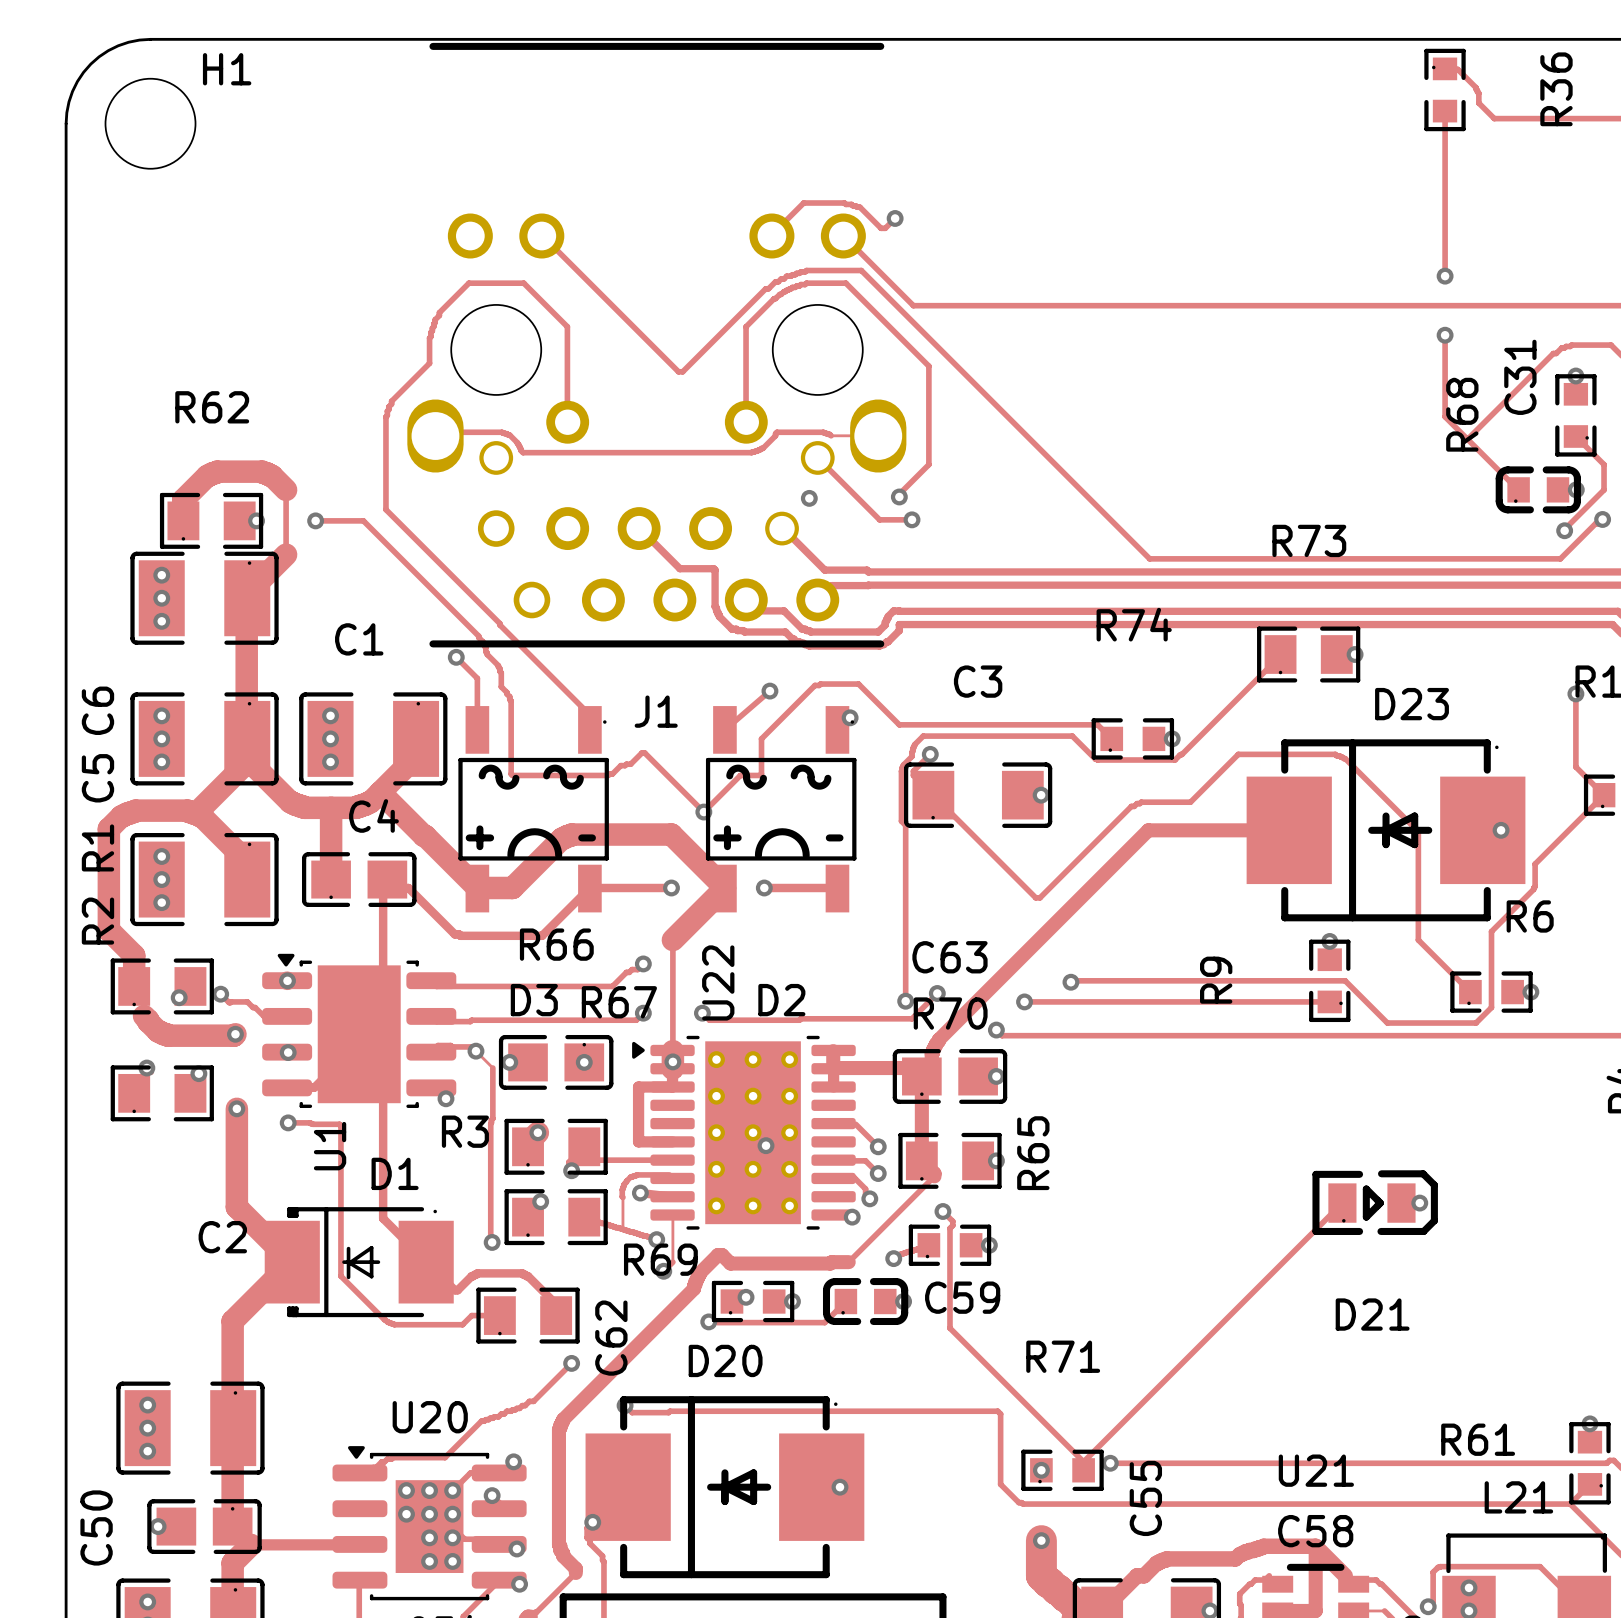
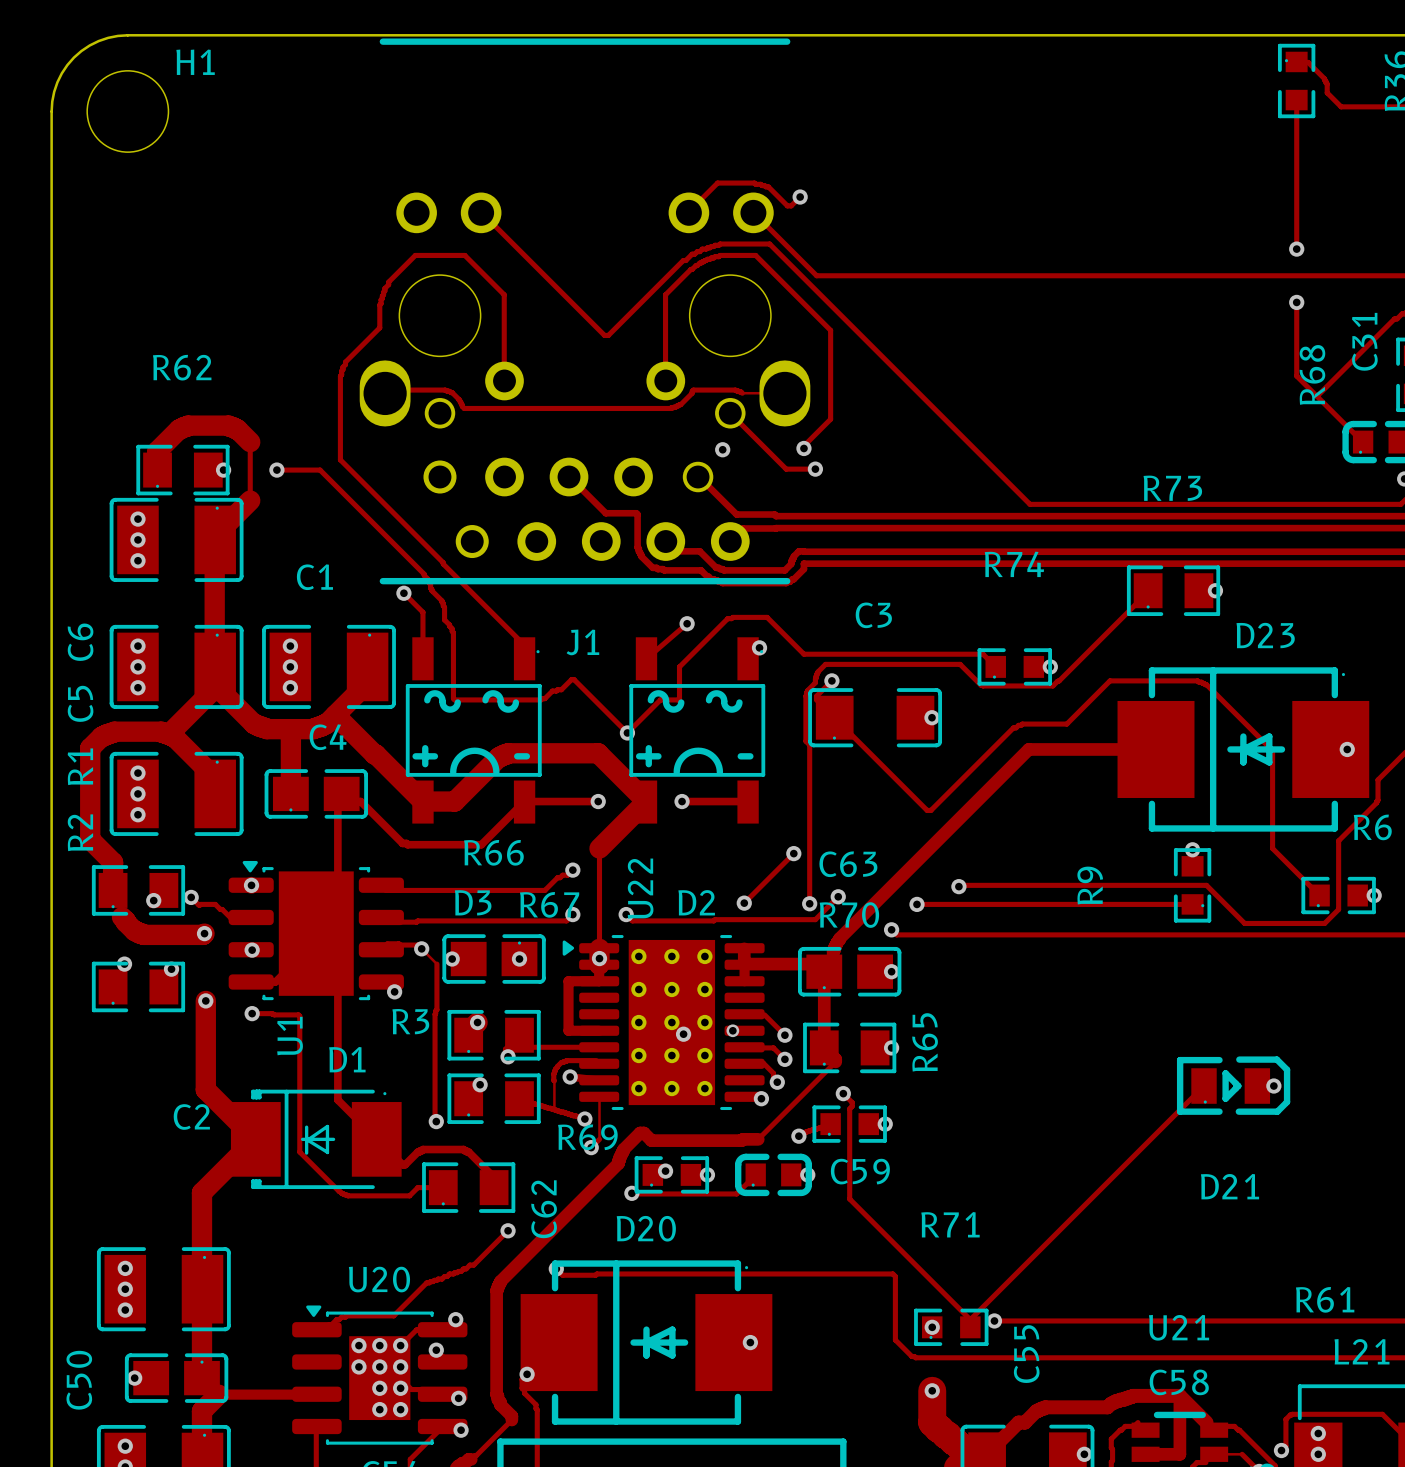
track: none -> (793, 853) (744, 903)
via: none -> (793, 853)
via: none -> (744, 903)
via: none -> (732, 1030)

